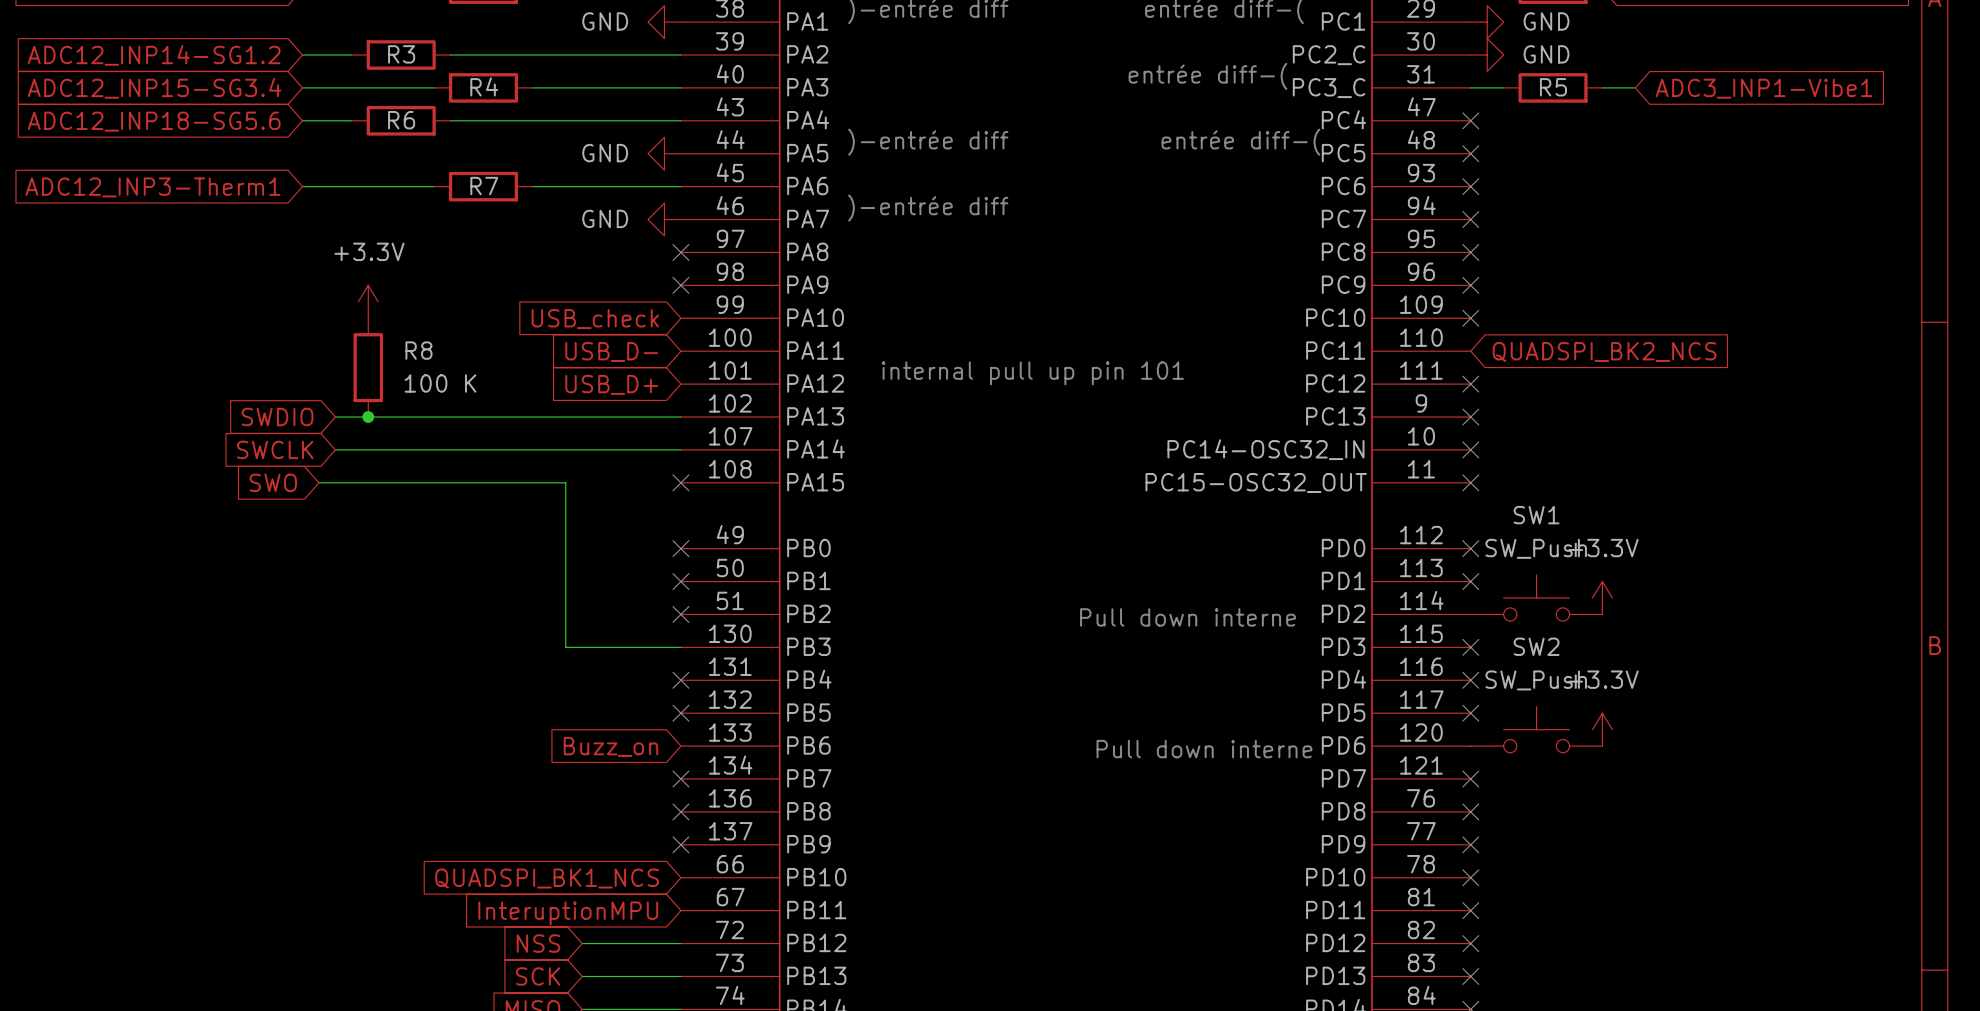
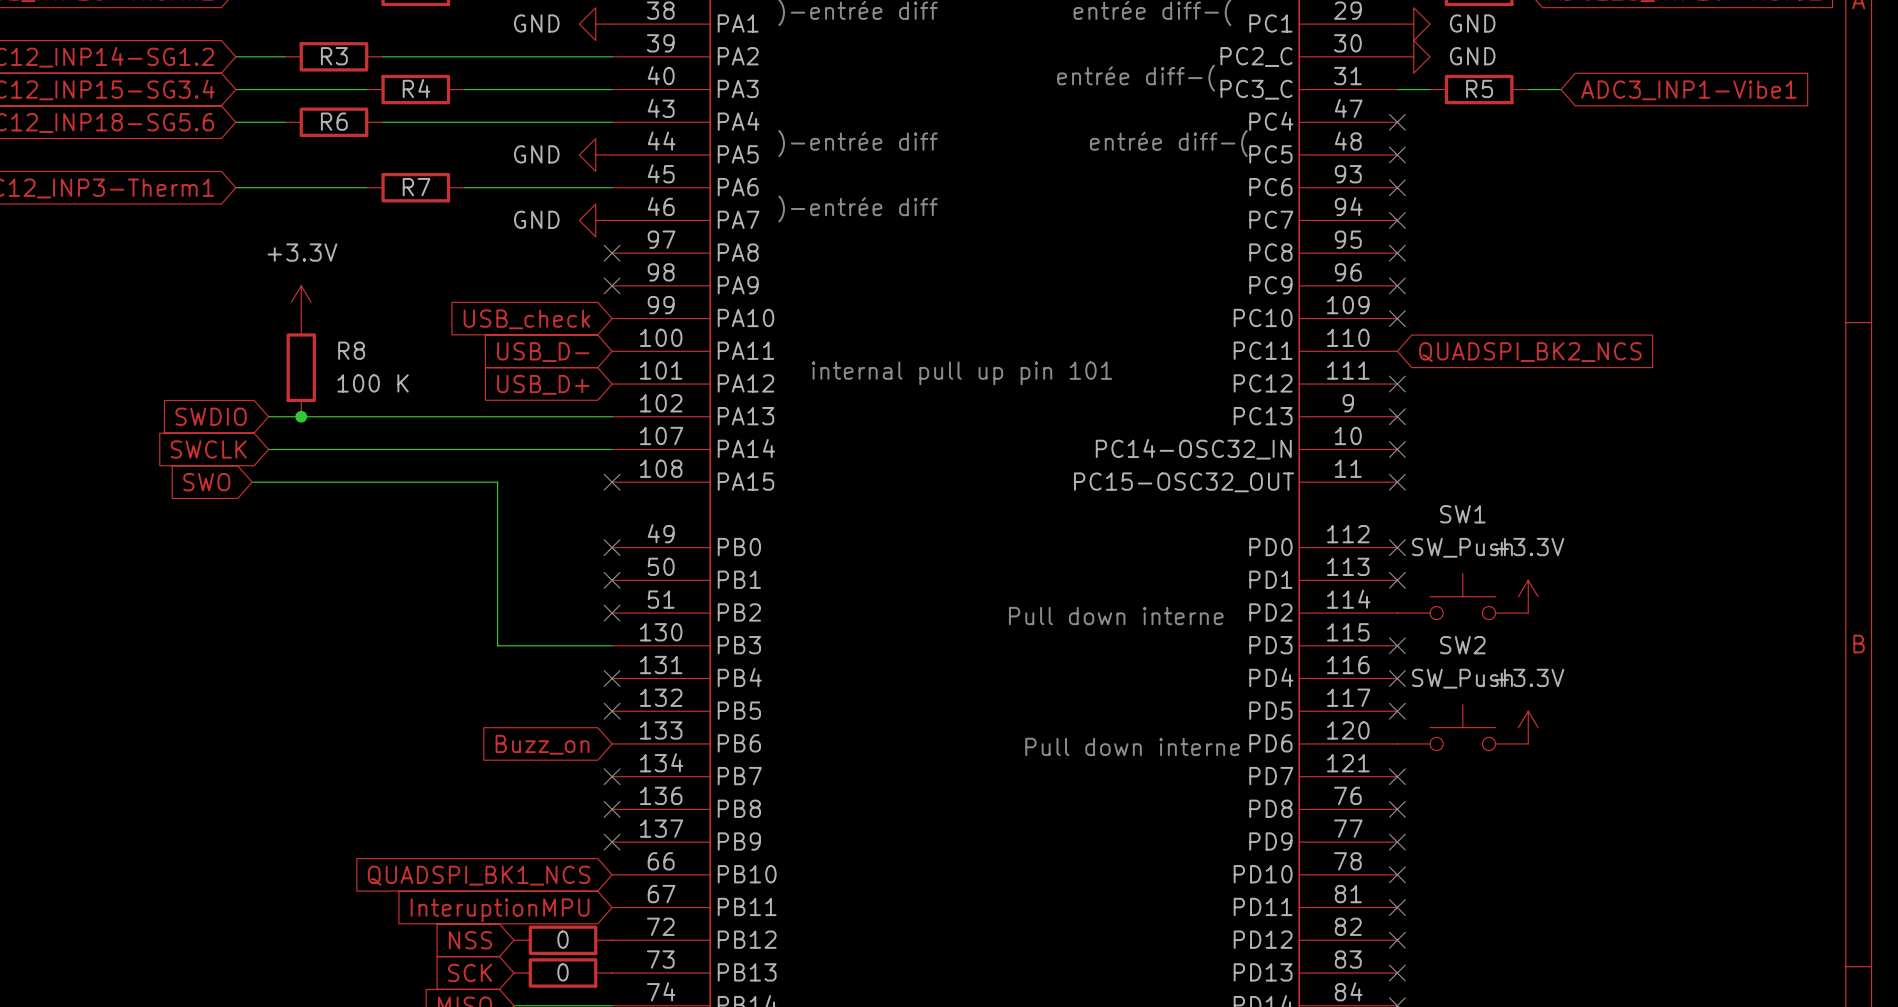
wire: (582, 943) (680, 943) -> none
part: none -> 0 (563, 940)
wire: (582, 976) (680, 976) -> none
part: none -> 0 (563, 973)

